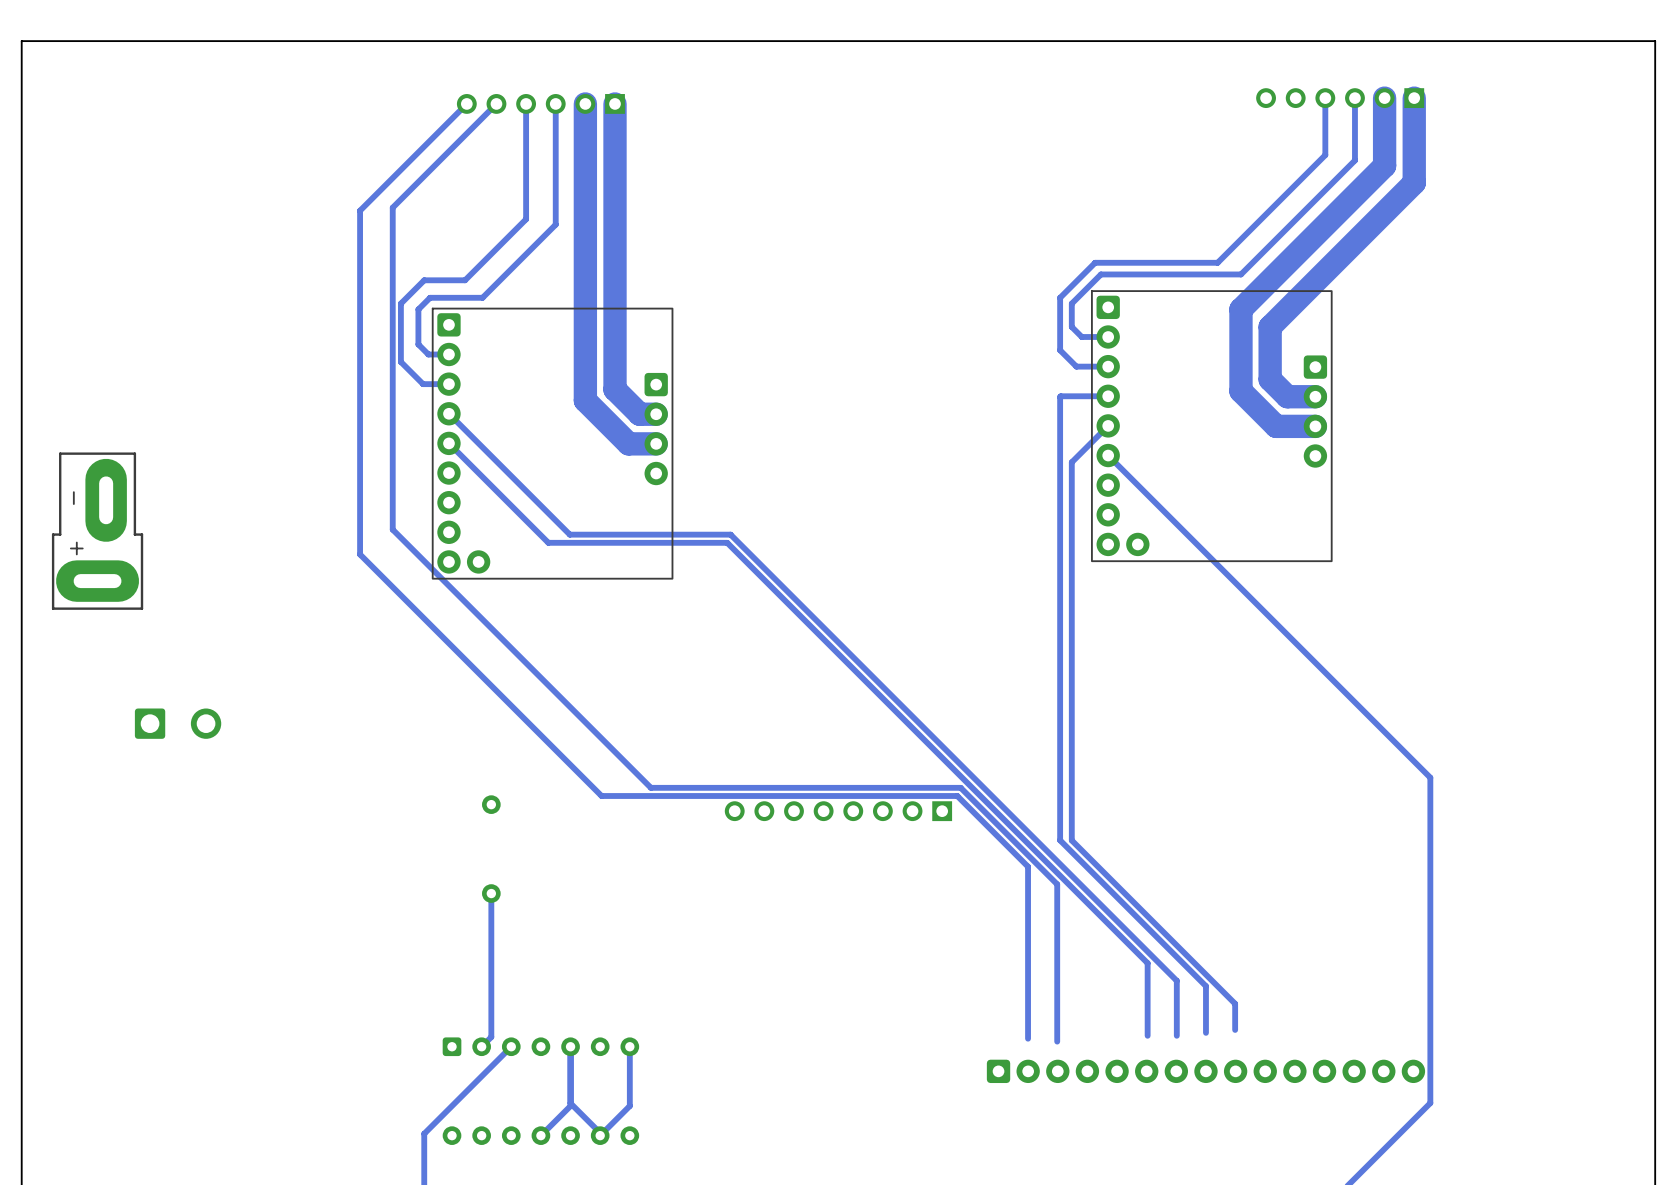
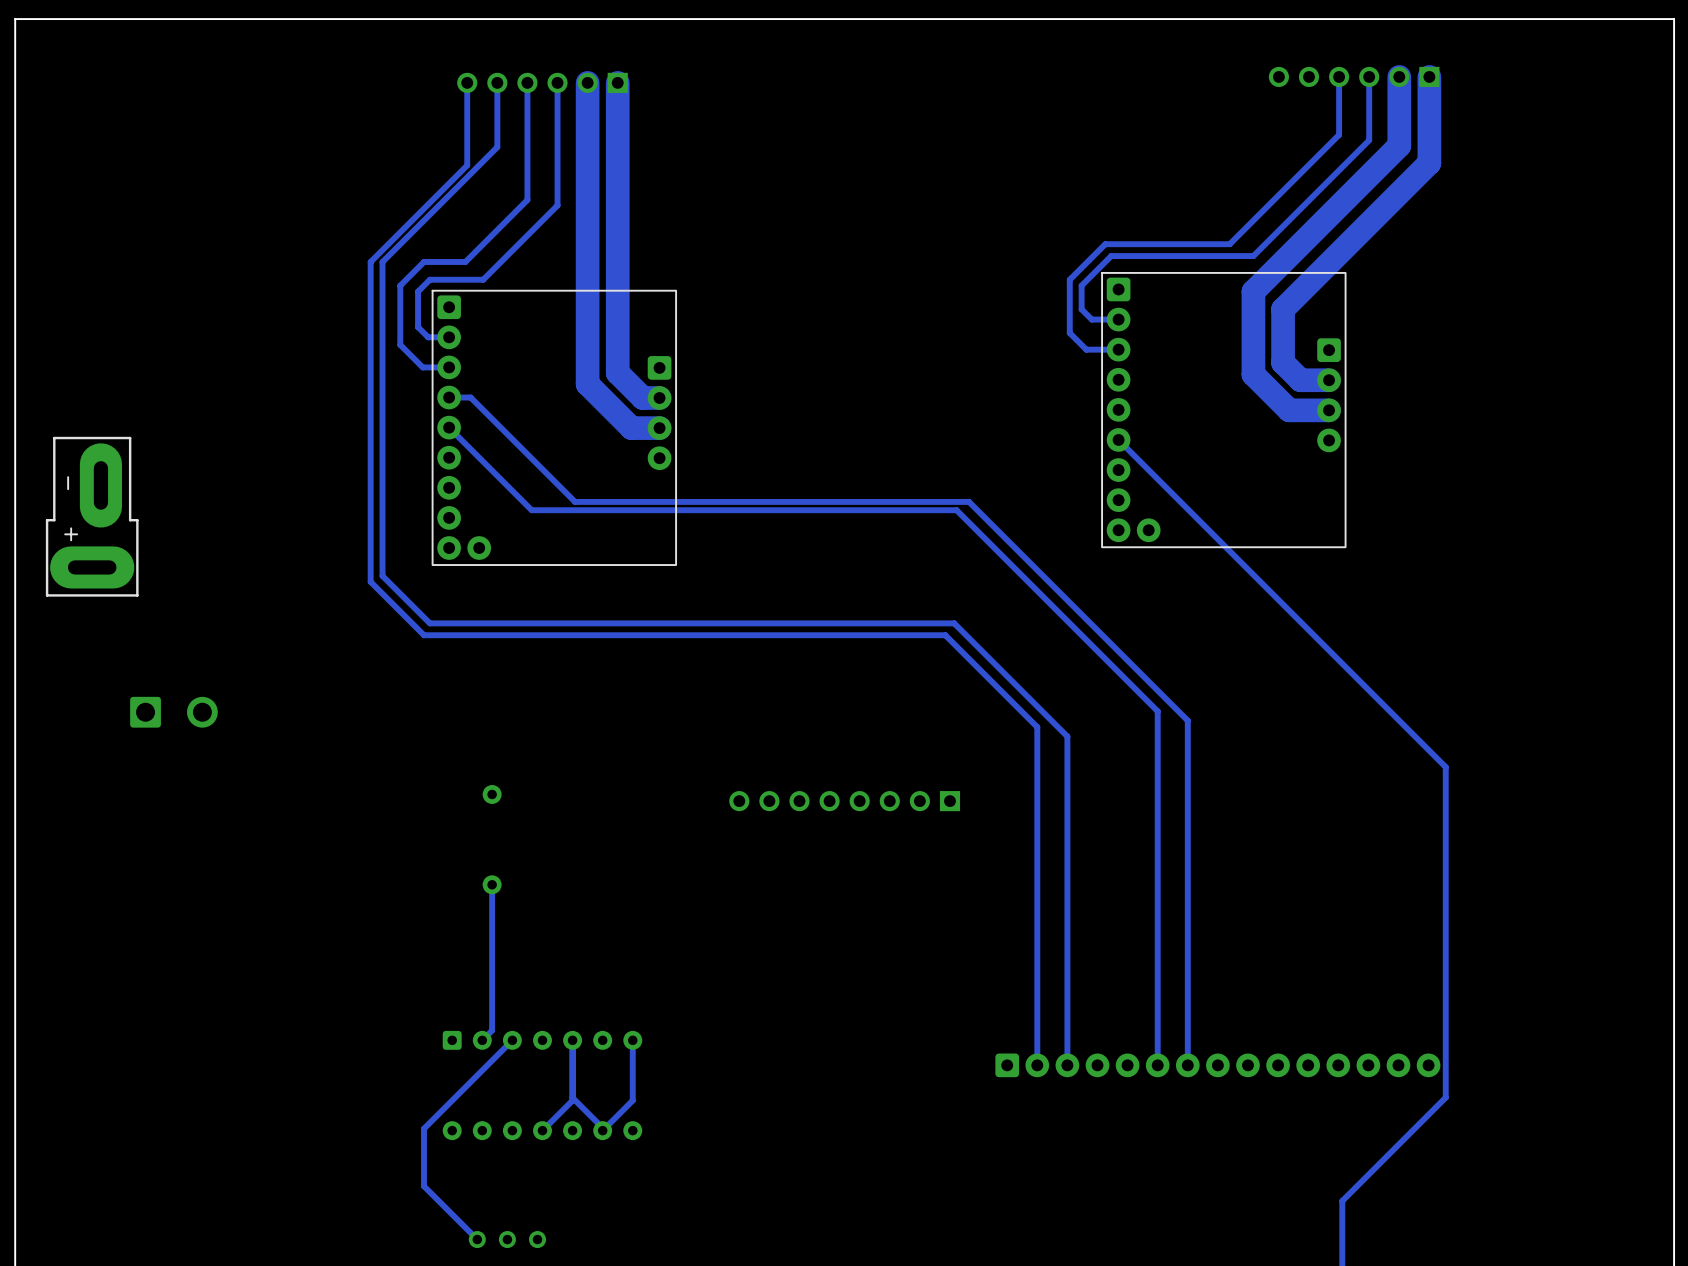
track: (466, 103) (360, 210) (360, 554) (601, 796) (957, 796) (1028, 866) (1028, 1038) -> (467, 82) (467, 165) (370, 261) (370, 581) (423, 635) (945, 635) (1037, 727) (1037, 1065)
track: (496, 103) (392, 207) (392, 529) (650, 787) (960, 787) (1057, 884) (1057, 1041) -> (497, 82) (497, 147) (382, 261) (382, 575) (429, 623) (954, 623) (1067, 736) (1067, 1065)
track: (1108, 396) (1060, 396) (1060, 840) (1205, 986) (1205, 1032) -> none
track: (448, 413) (569, 534) (730, 534) (1176, 980) (1176, 1035) -> (449, 397) (470, 397) (575, 501) (969, 501) (1187, 720) (1187, 1065)
track: (1108, 425) (1071, 462) (1071, 840) (1235, 1003) (1235, 1029) -> none
track: (530, 524) (548, 542) (727, 542) (1147, 963) (1147, 1035) -> (531, 510) (956, 510) (1157, 711) (1157, 1065)

